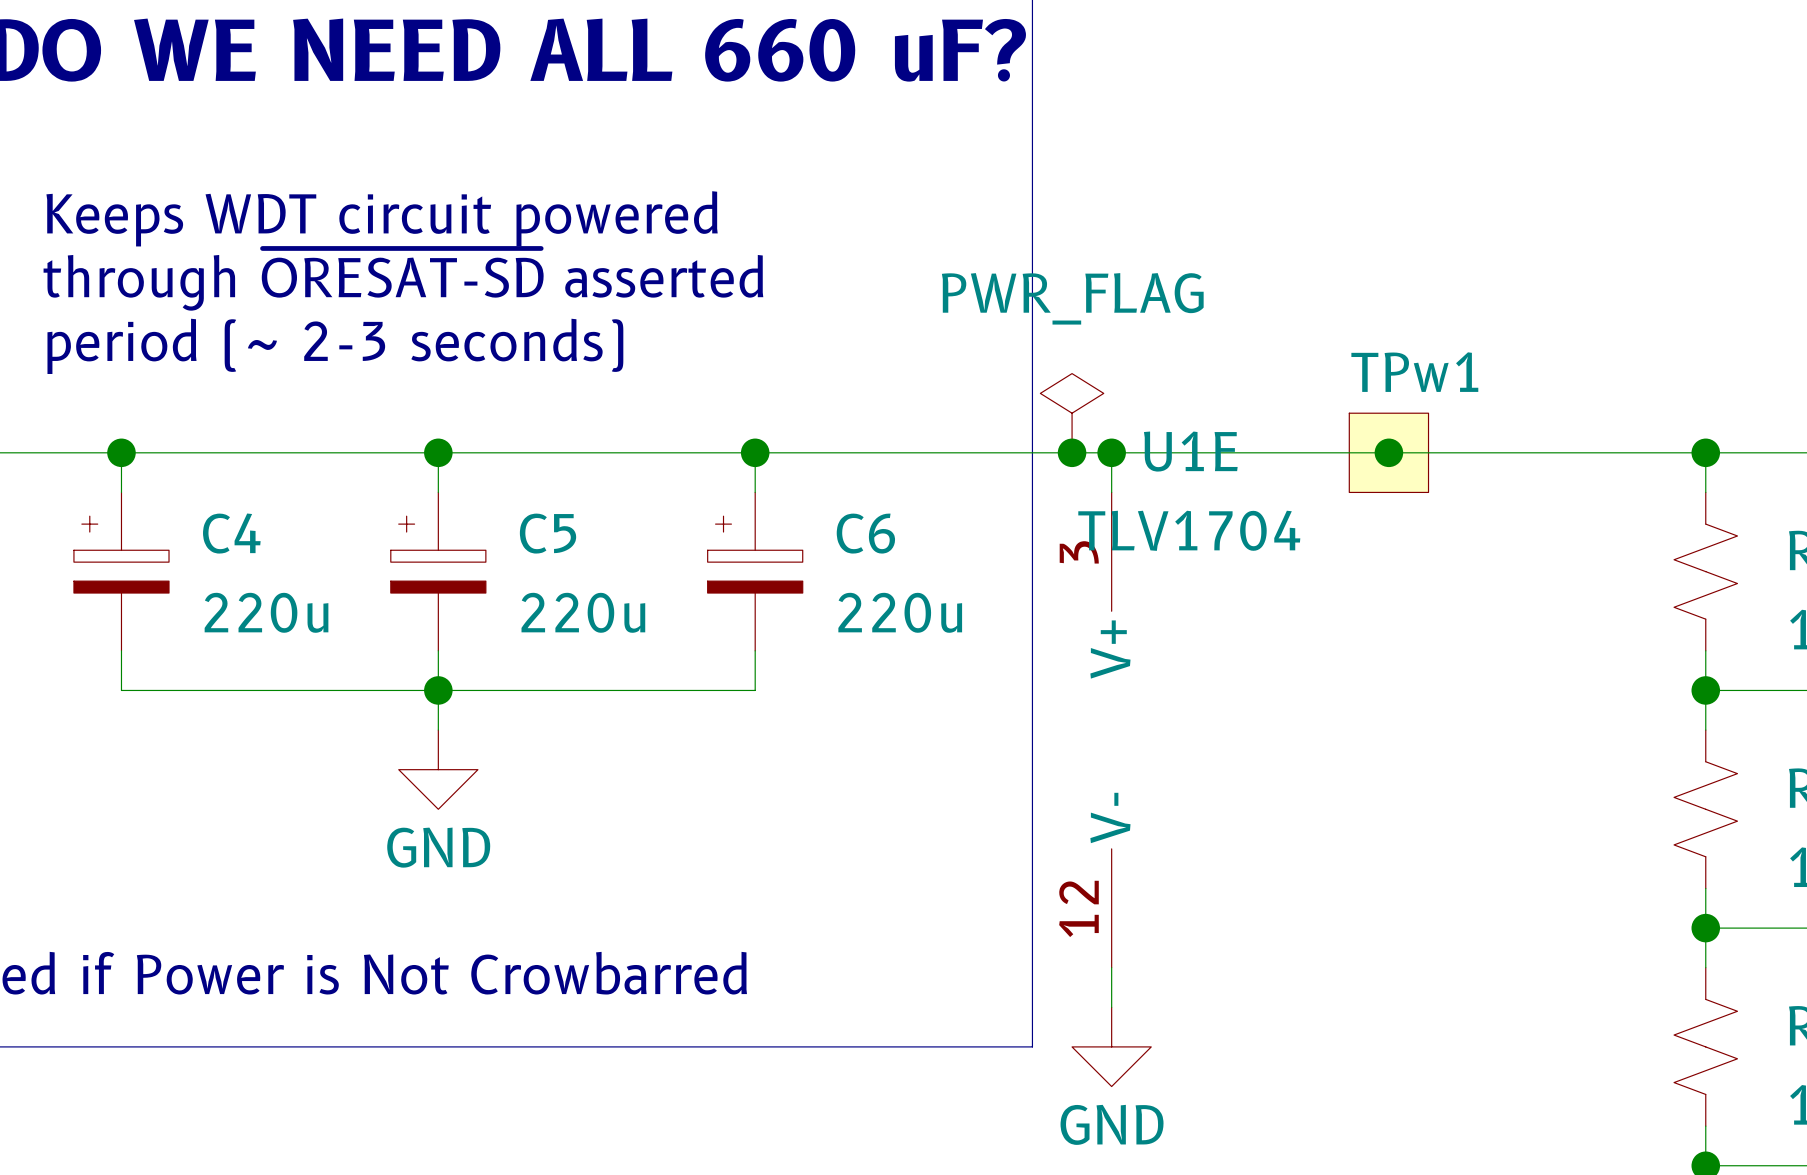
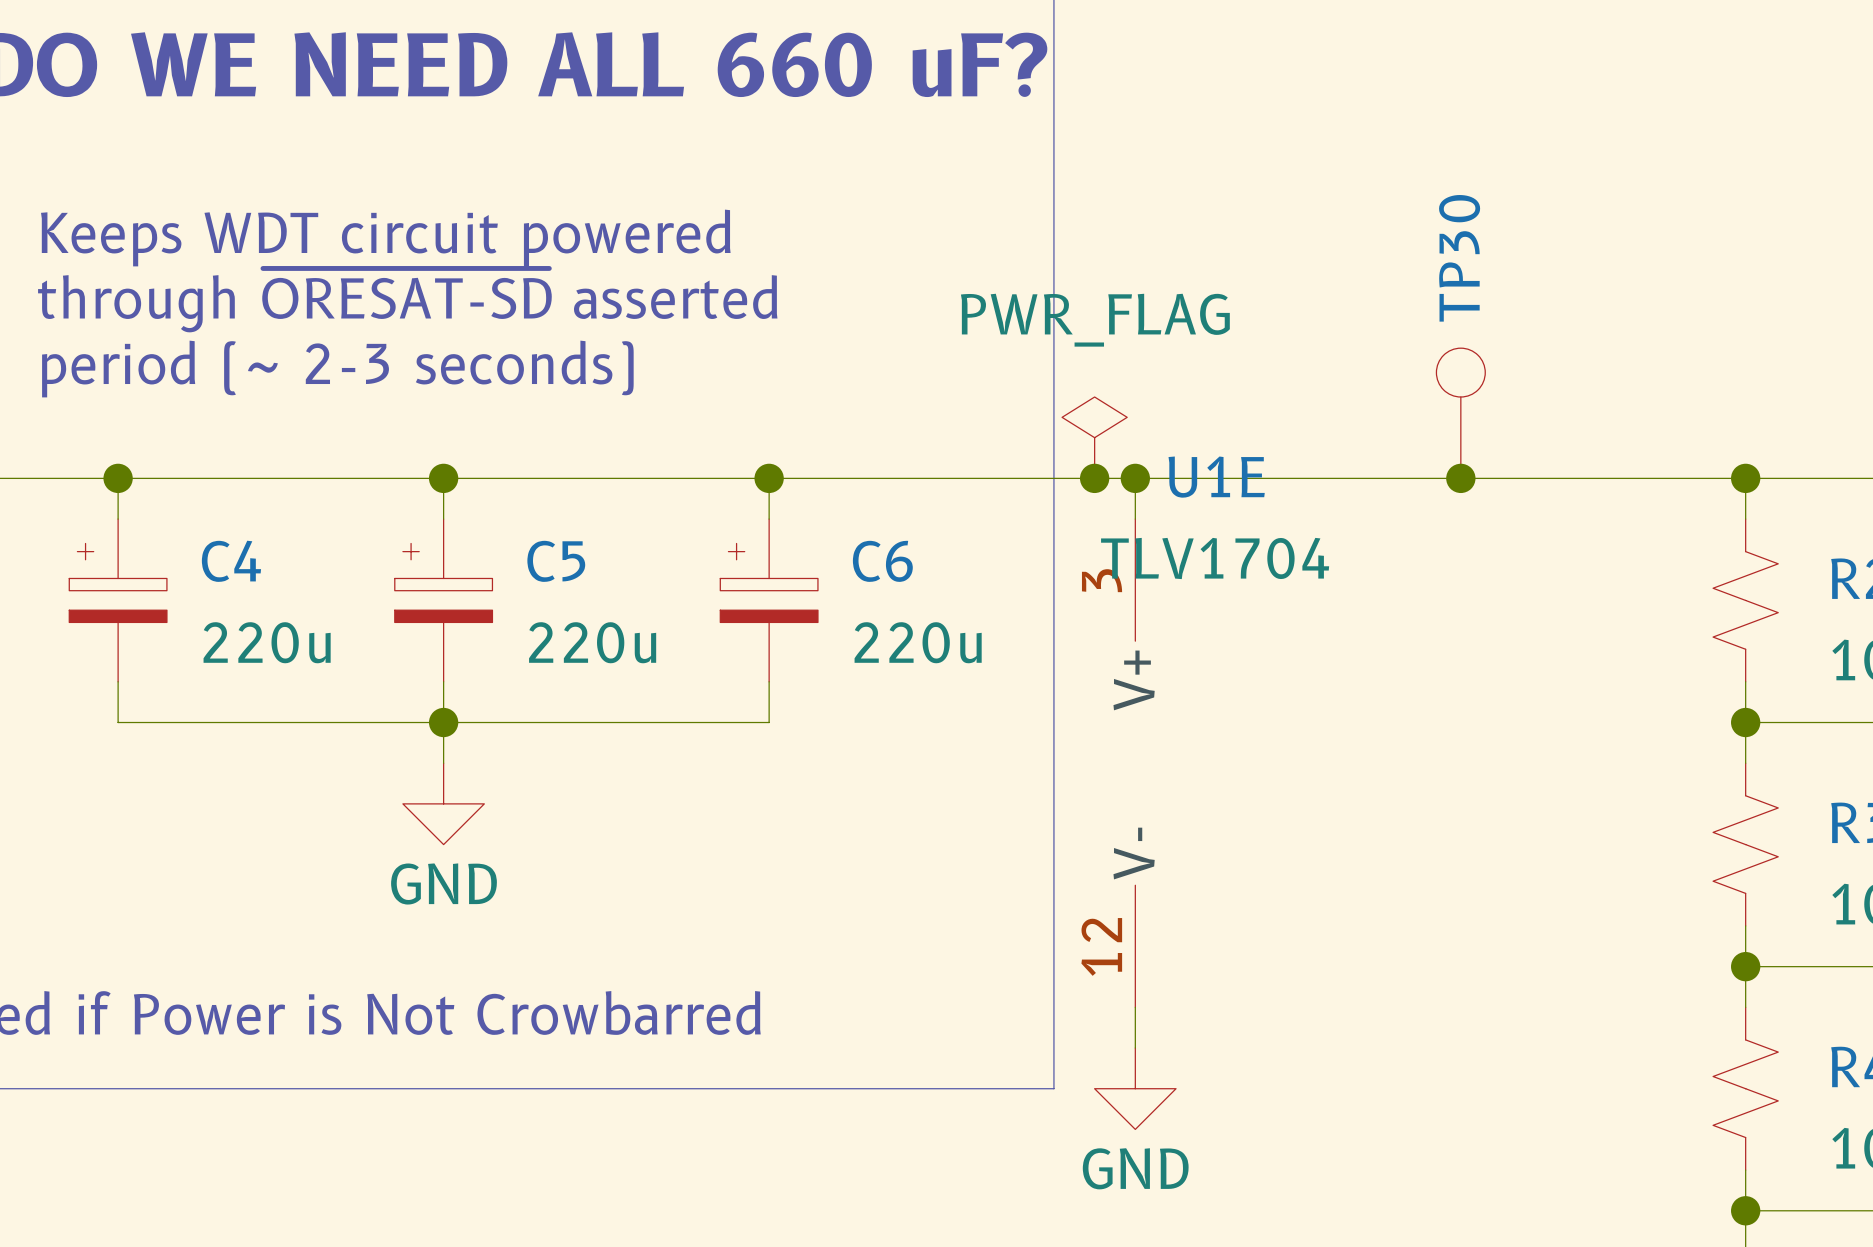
TP30: none -> (1460, 413)
junction position: (1388, 452) -> (1460, 478)
TPw1: (1388, 452) -> none

